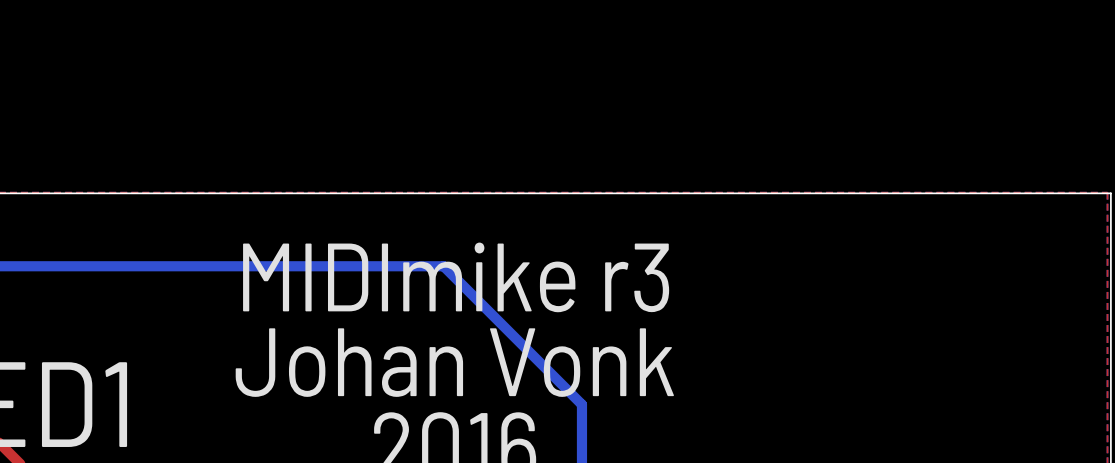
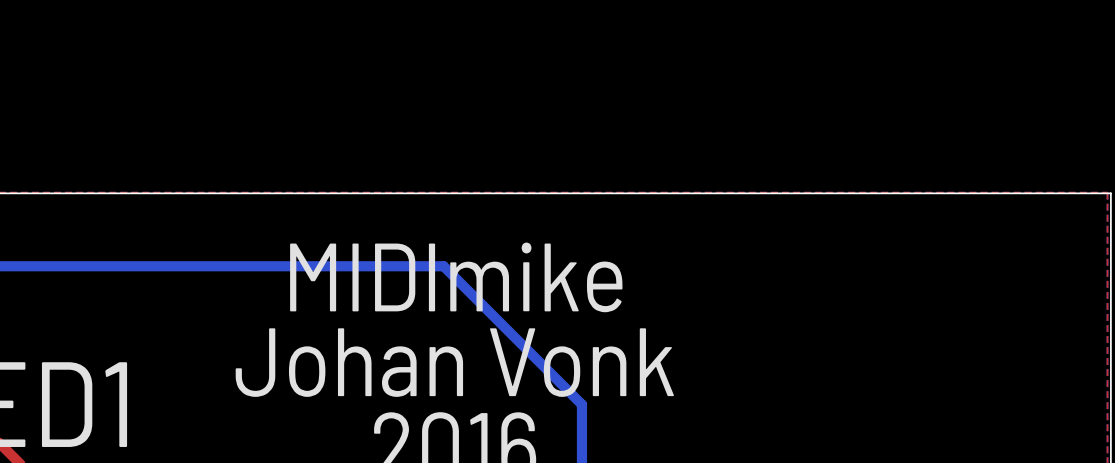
text: MIDImike r3 (456, 277) -> MIDImike (456, 277)

